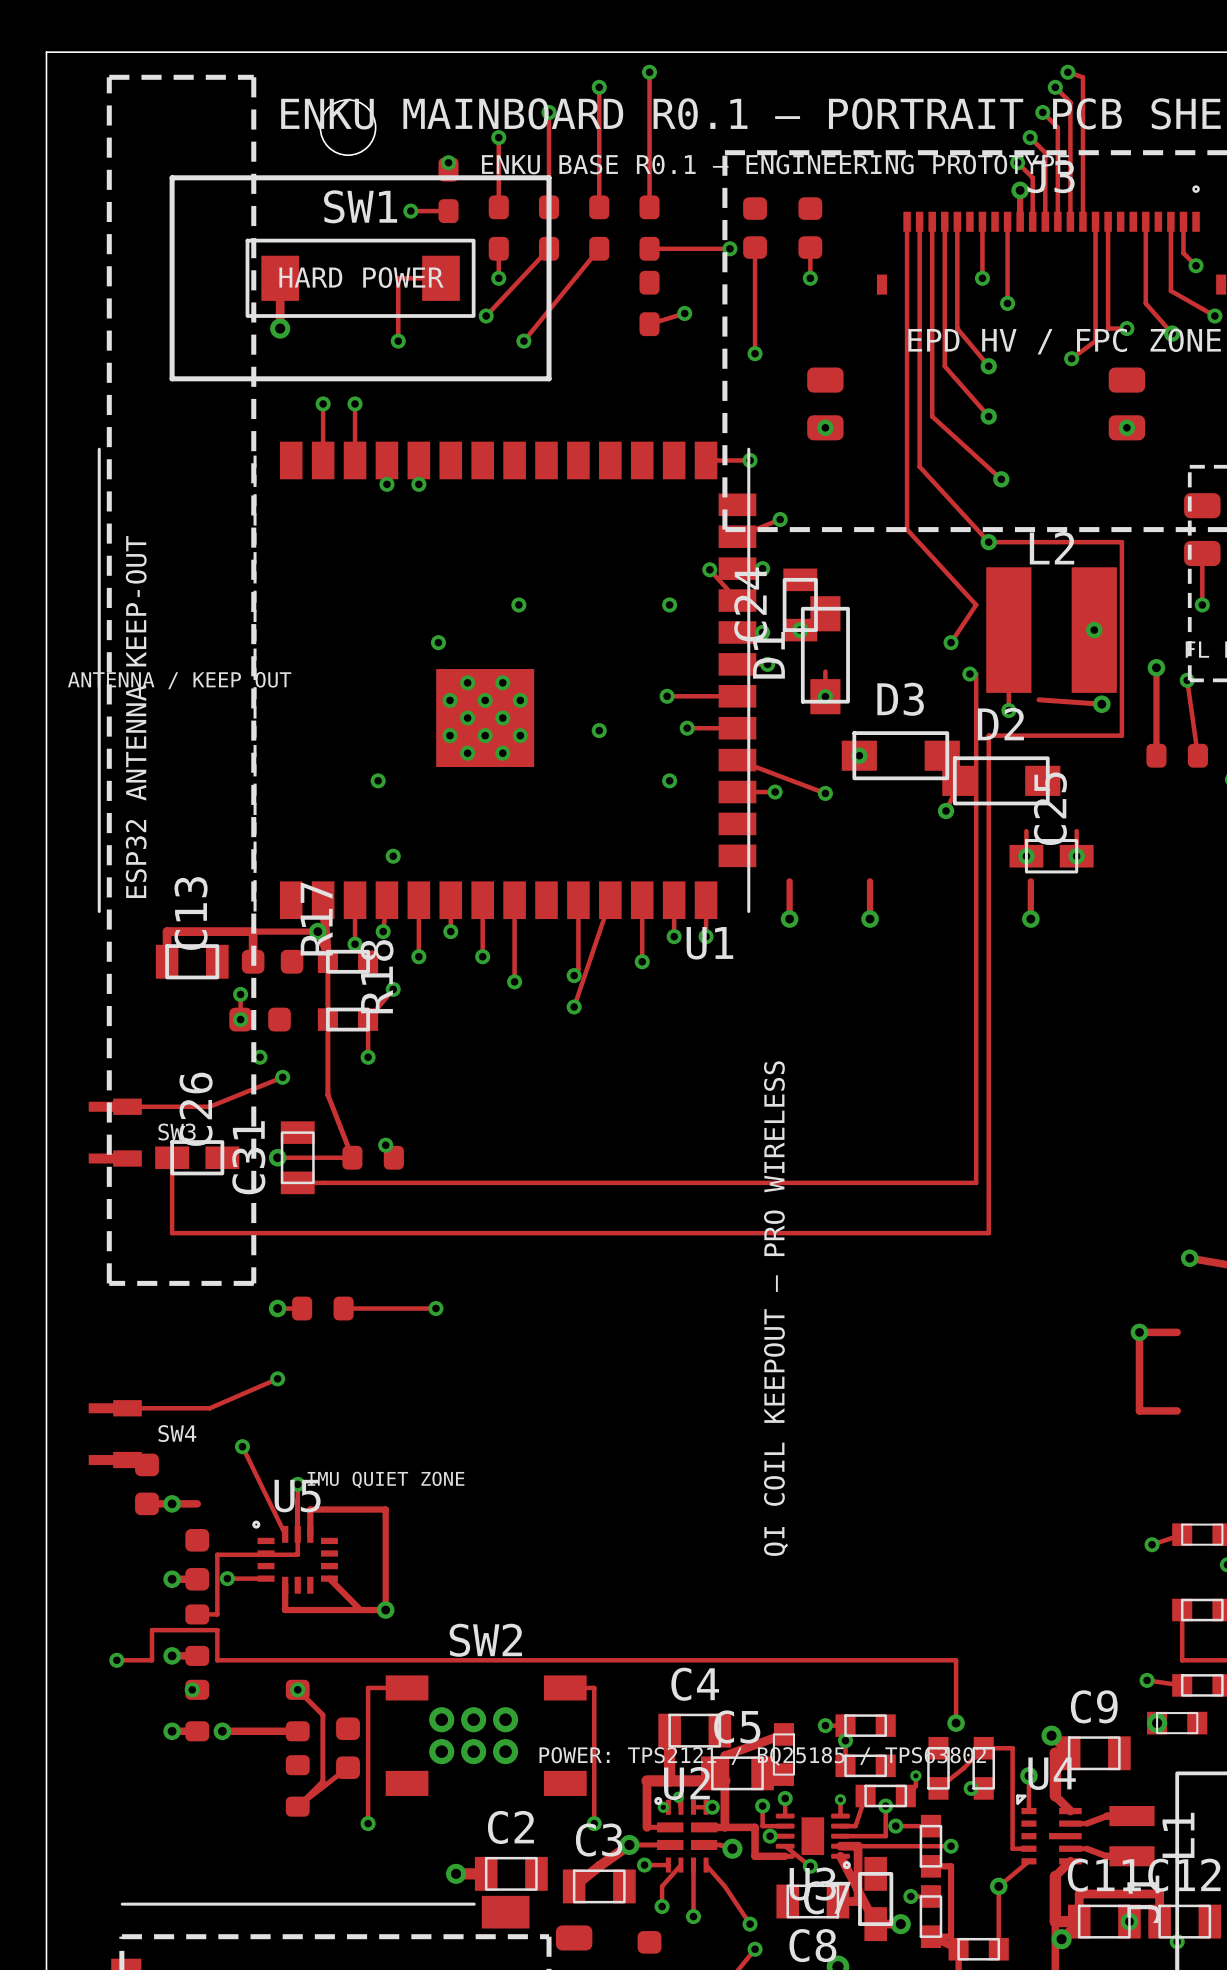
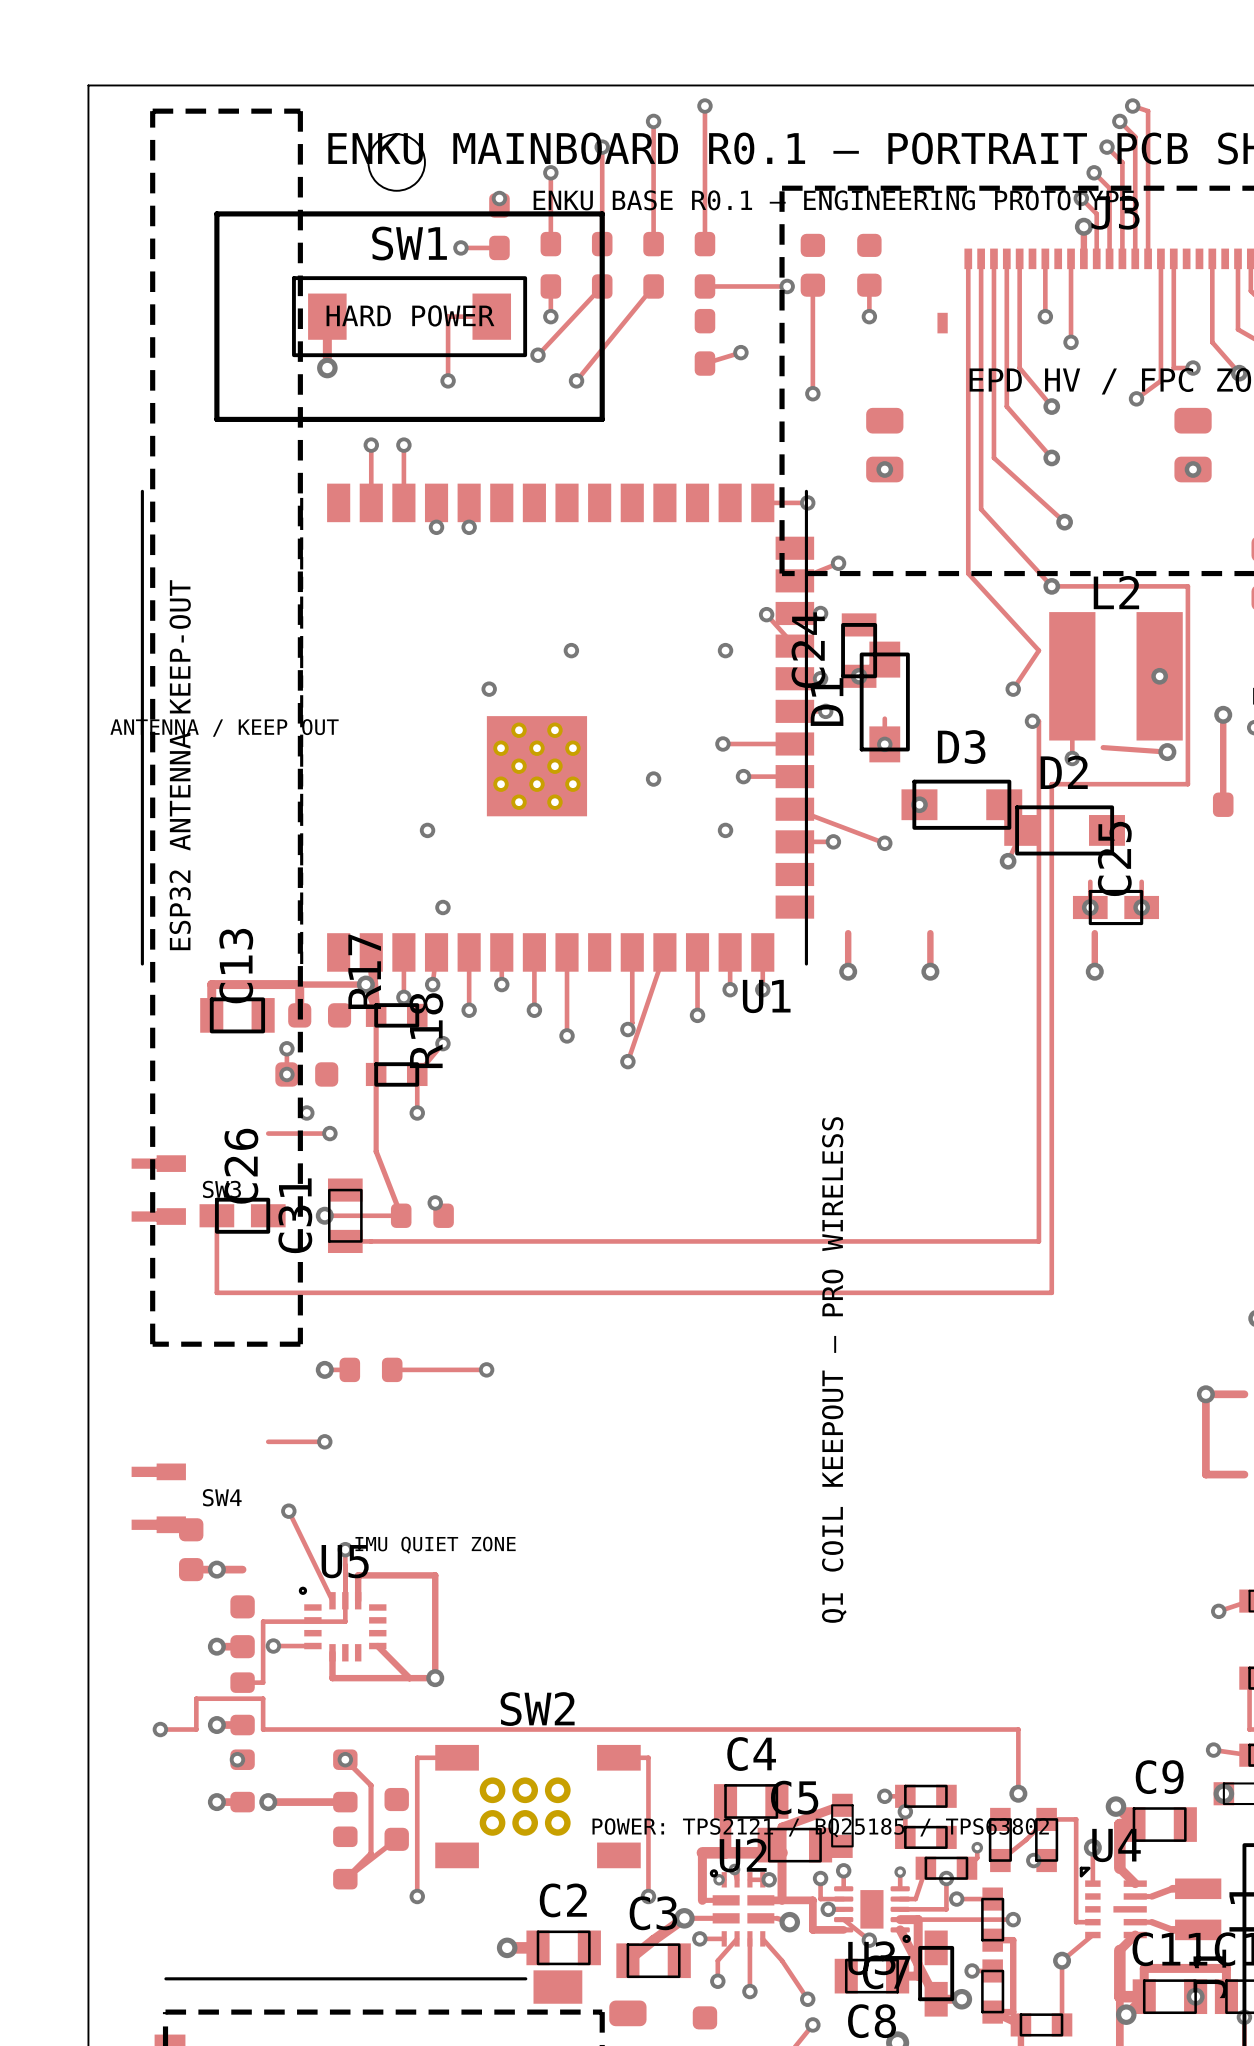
track: (282, 1077) (209, 1106) (103, 1106) -> (329, 1133) (268, 1133)
track: (277, 1378) (209, 1408) (103, 1408) -> (324, 1441) (268, 1441)

